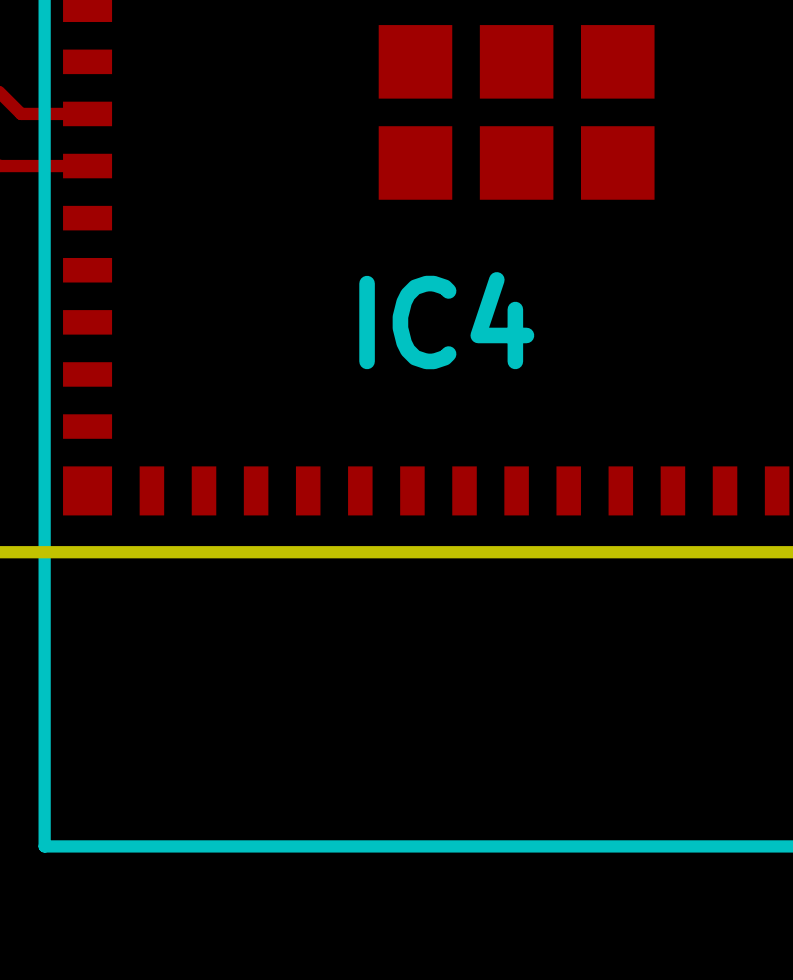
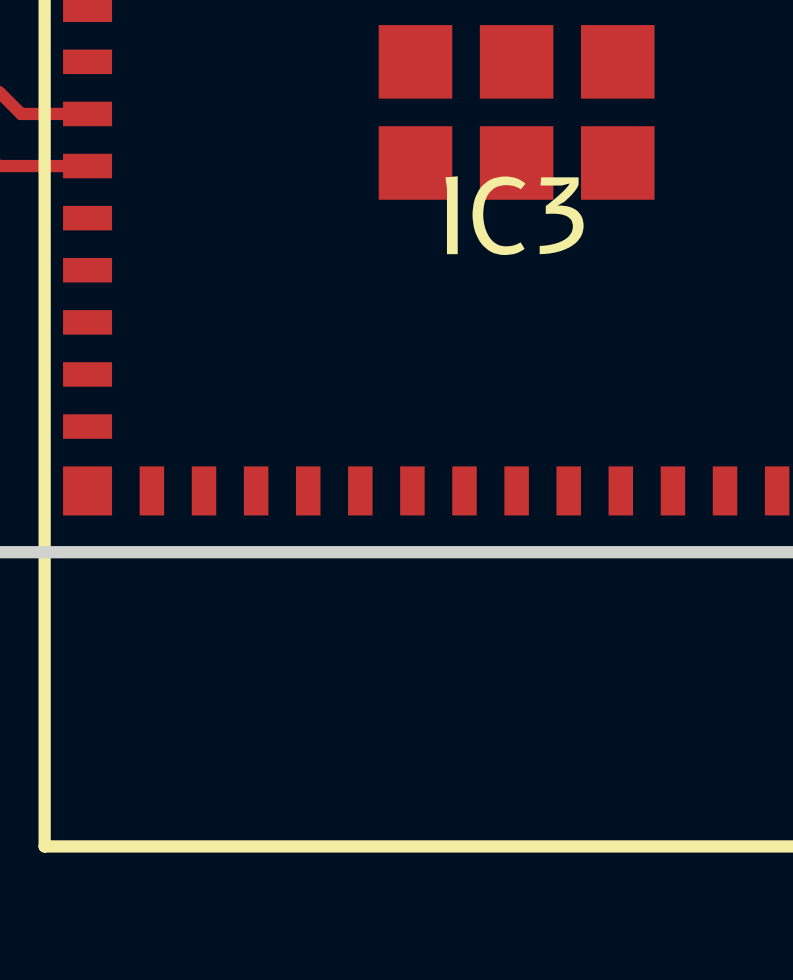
IC4 name: IC4 (446, 320) -> IC3 (514, 215)

